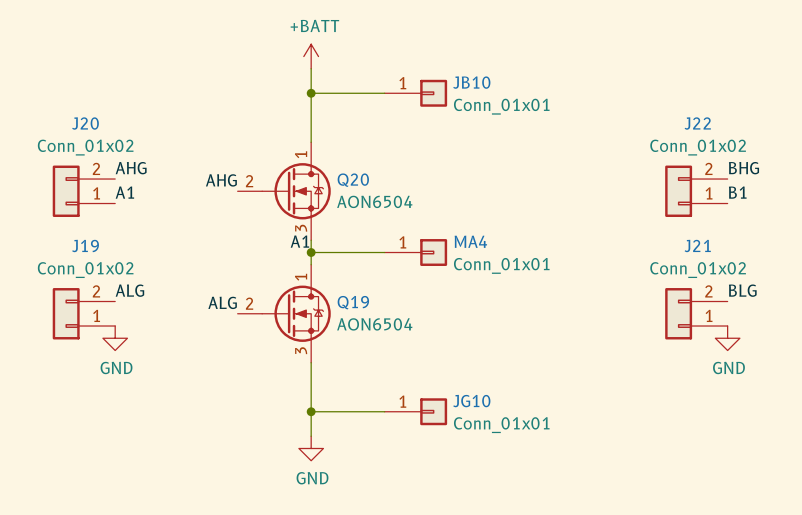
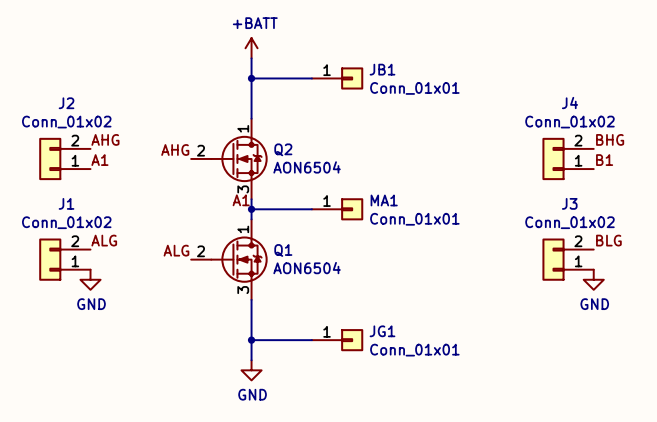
JB10 name: JB10 (471, 82) -> JB1 (382, 69)
J20 name: J20 (85, 123) -> J2 (66, 103)
J22 name: J22 (697, 123) -> J4 (569, 103)
Q20 name: Q20 (353, 180) -> Q2 (283, 149)
MA4 name: MA4 (470, 241) -> MA1 (384, 200)
J19 name: J19 (85, 246) -> J1 (66, 203)
J21 name: J21 (697, 246) -> J3 (569, 203)
Q19 name: Q19 (353, 302) -> Q1 (283, 250)
JG10 name: JG10 (471, 401) -> JG1 (382, 331)

